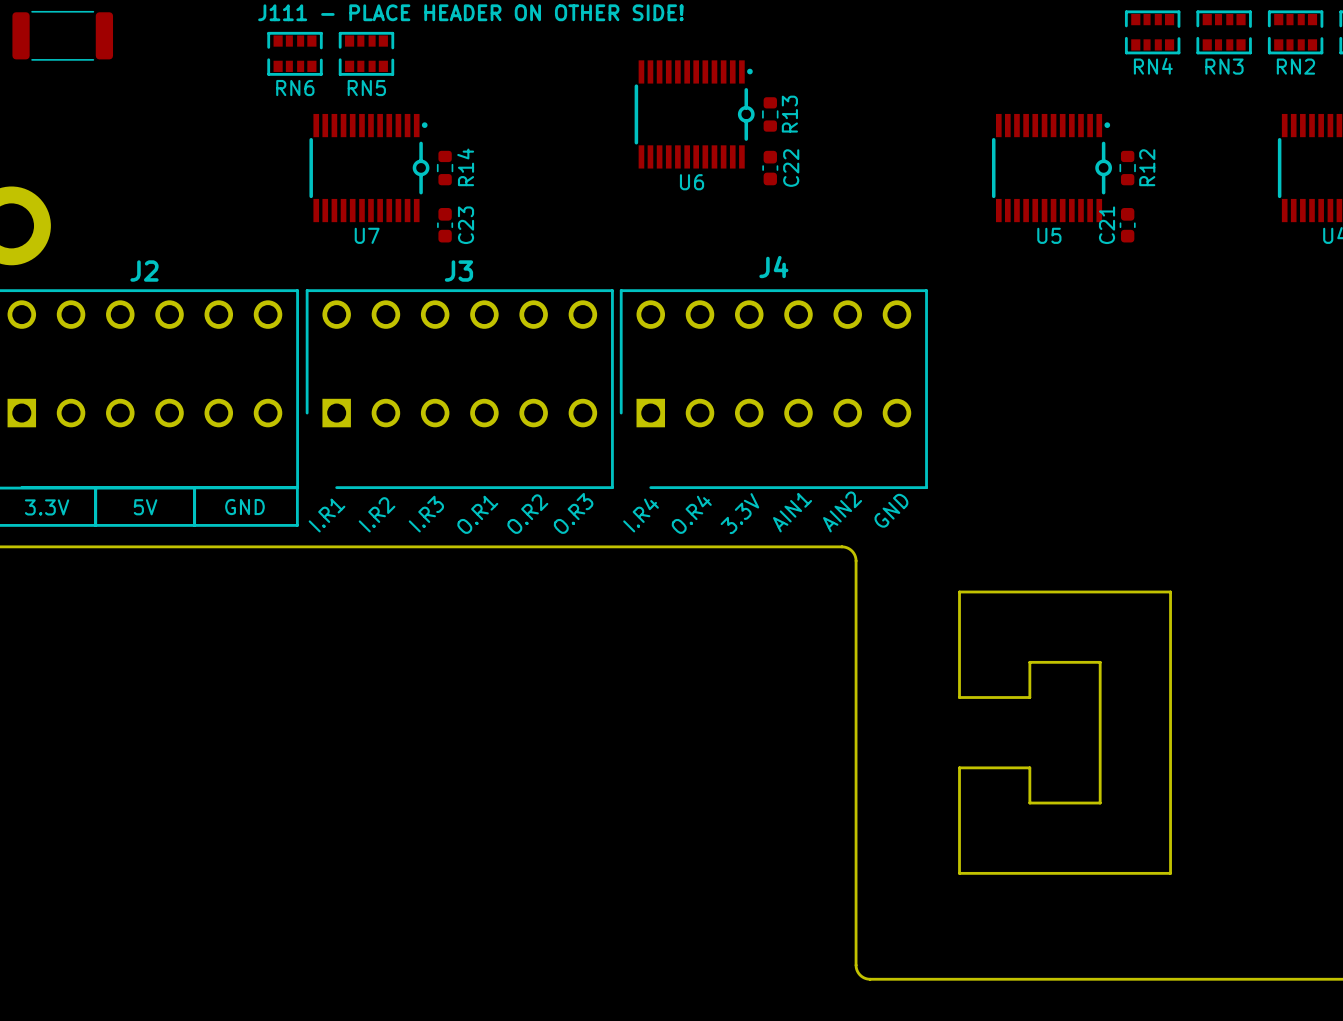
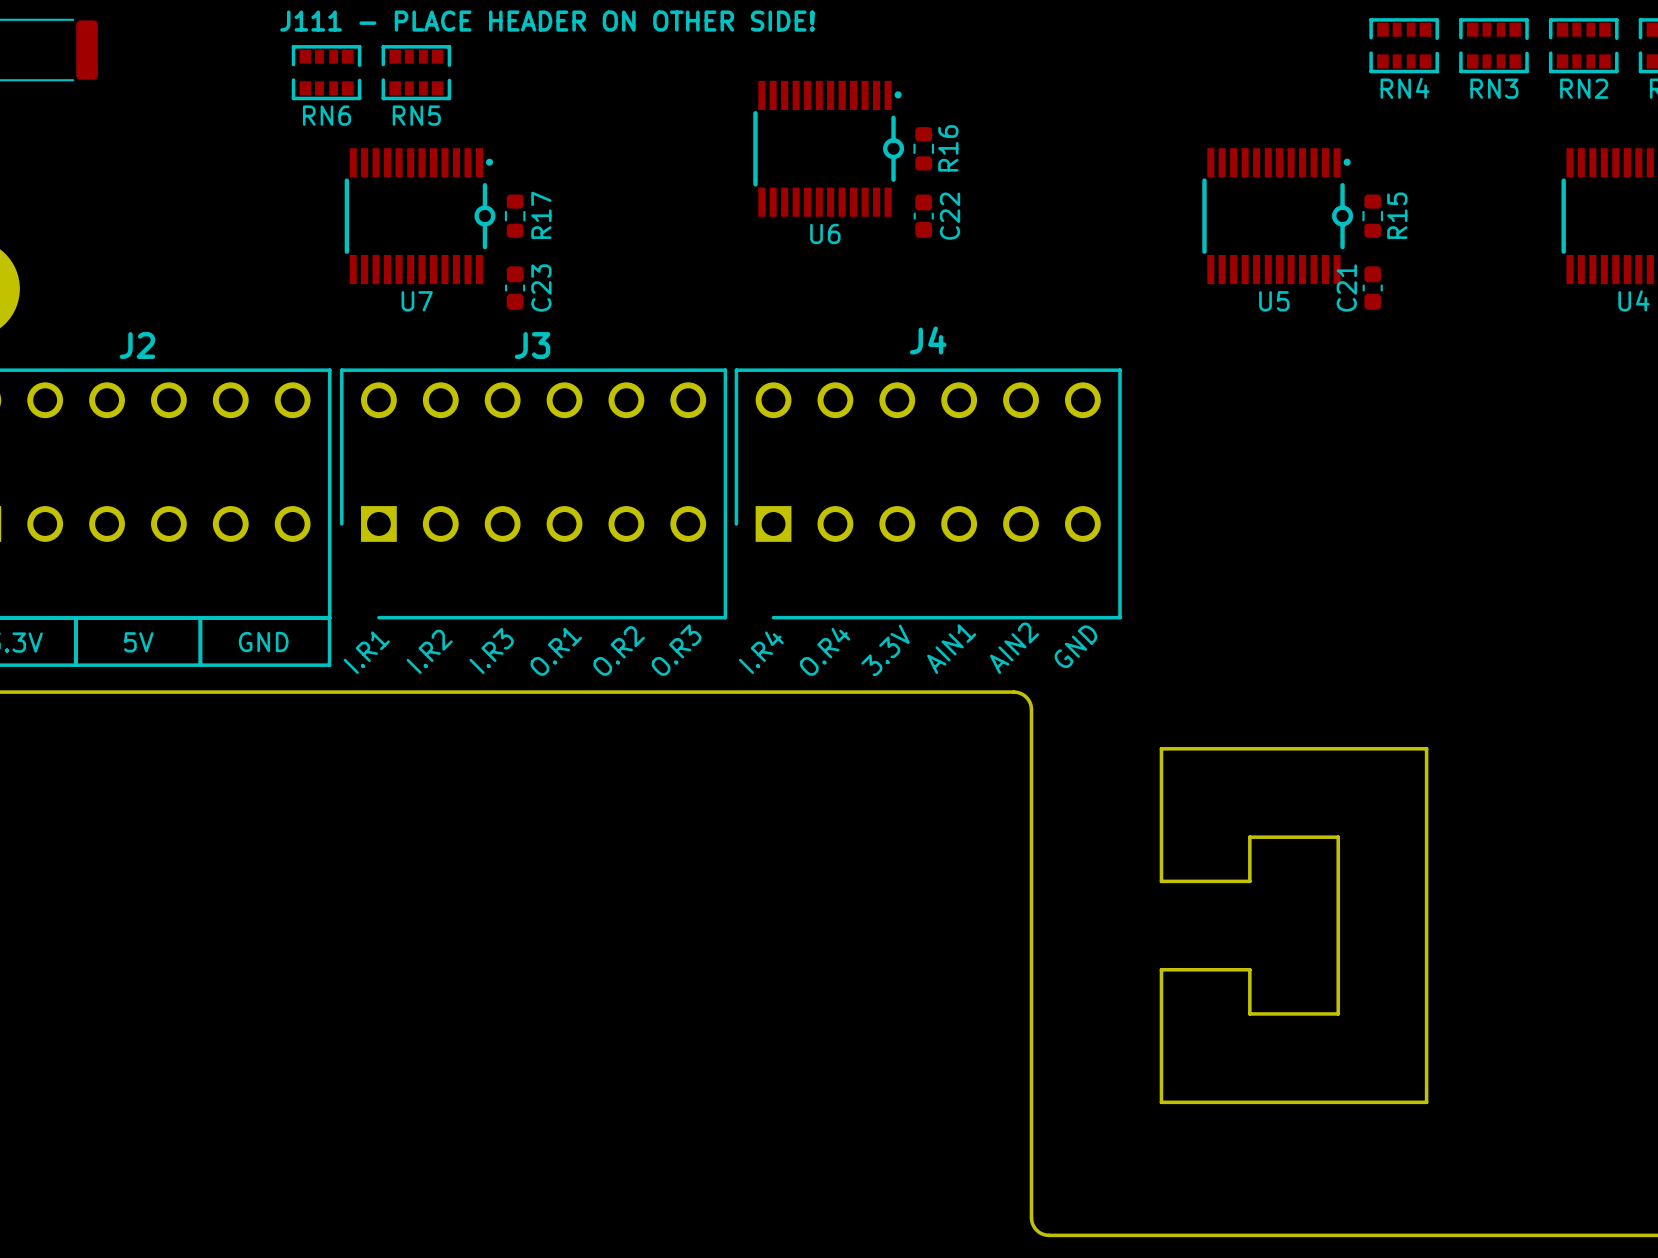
R13 name: R13 (789, 114) -> R16 (948, 148)
R14 name: R14 (465, 167) -> R17 (541, 215)
R12 name: R12 (1147, 167) -> R15 (1397, 215)

